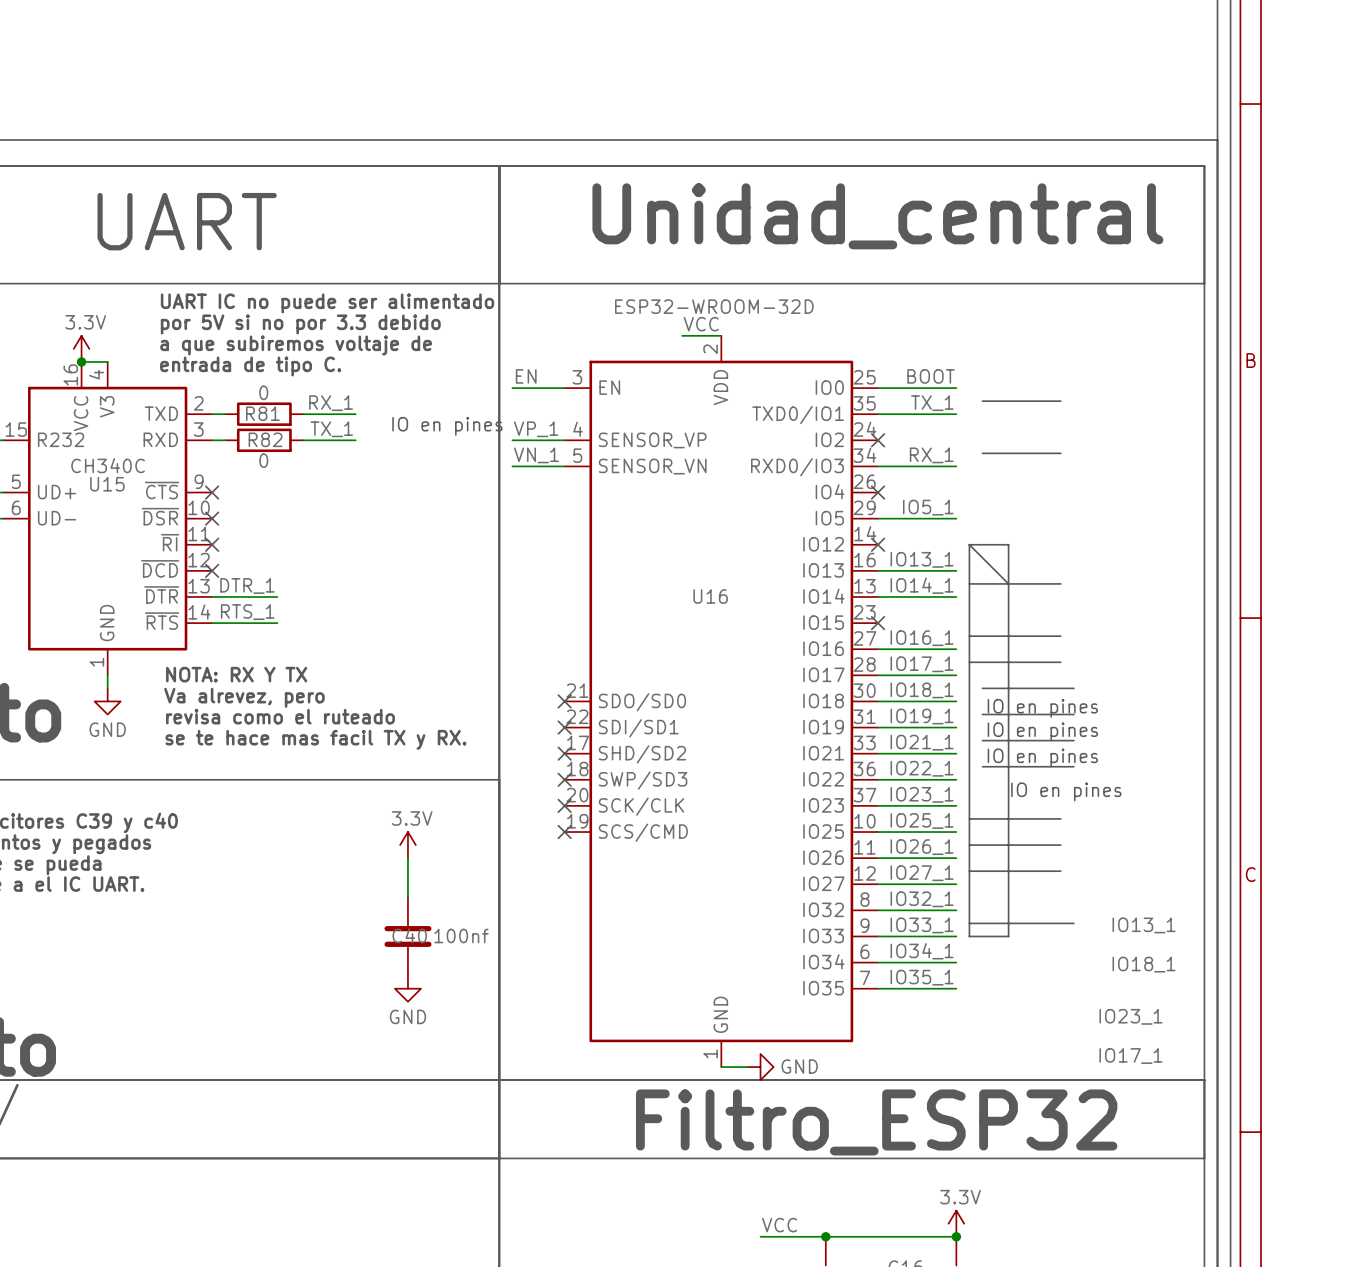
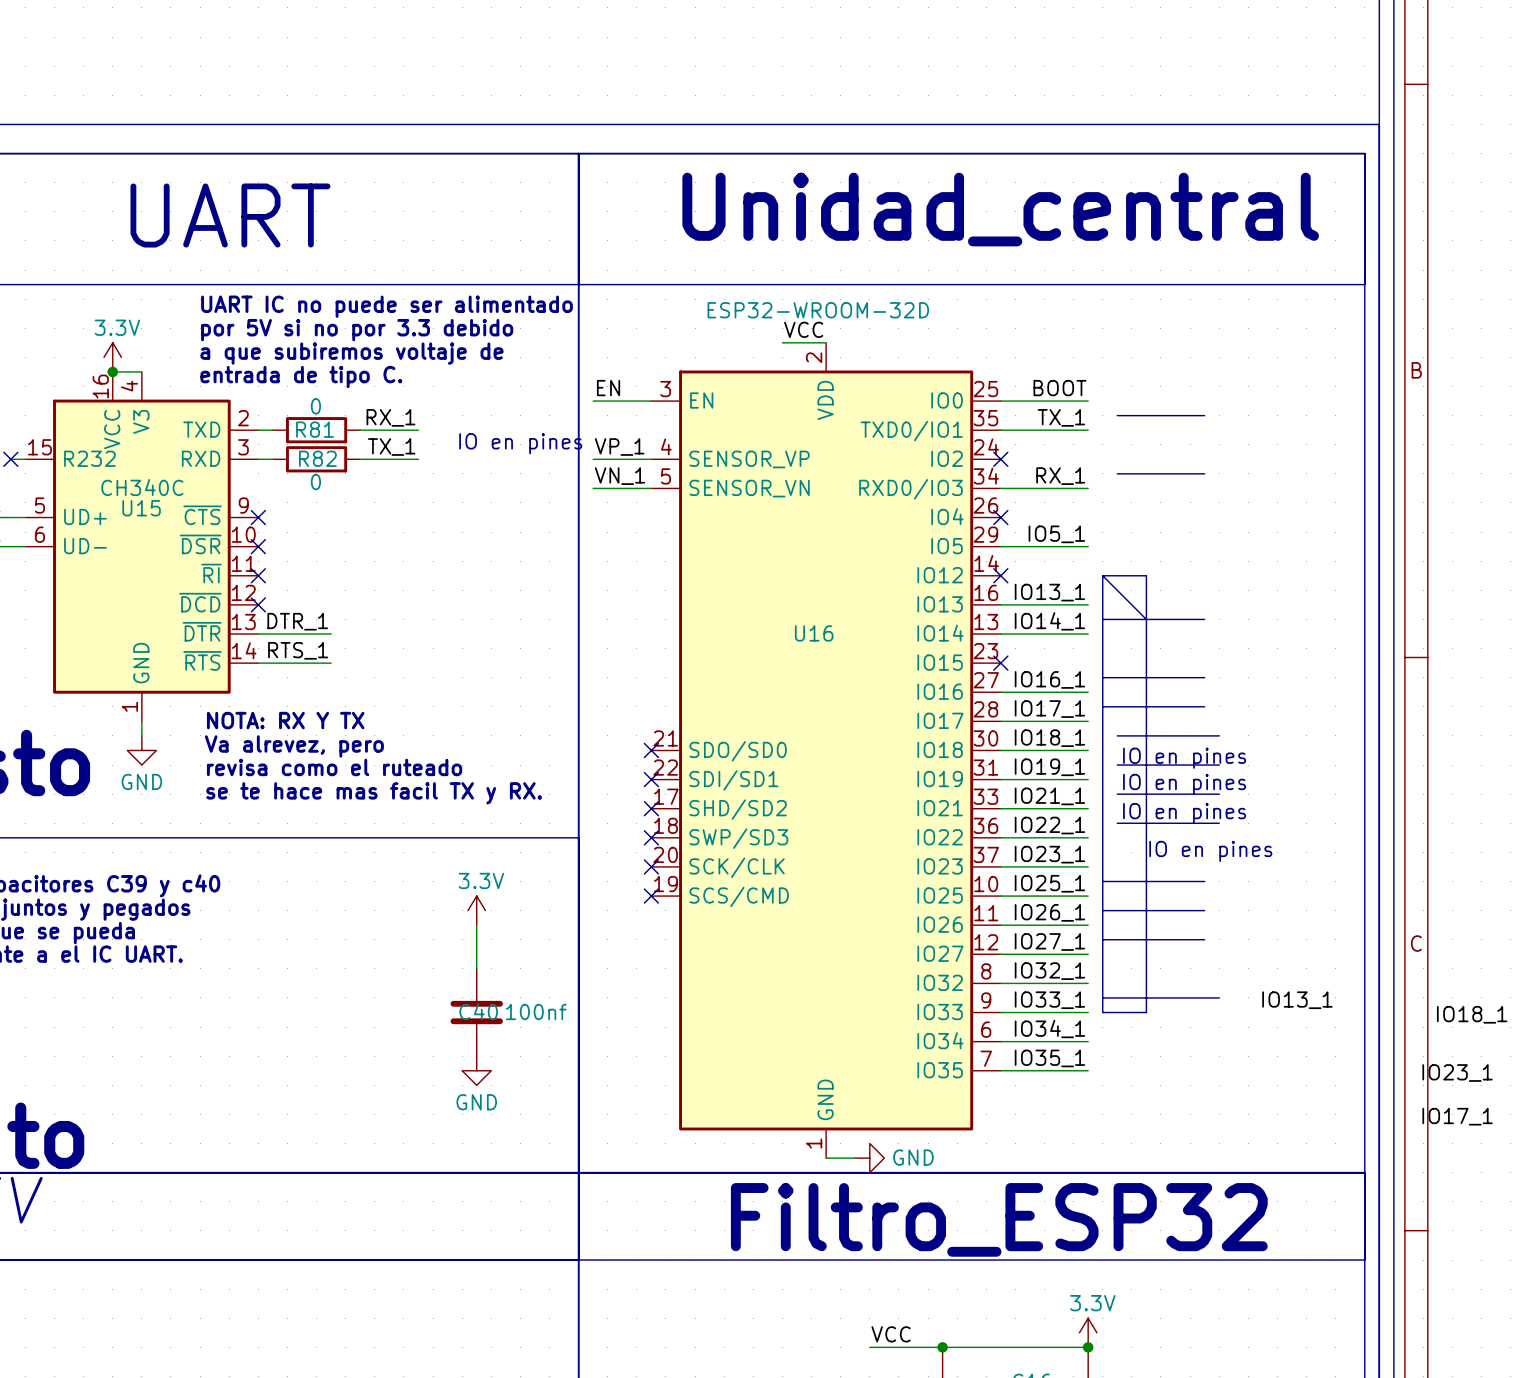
label position: IO18_1 (1144, 964) -> IO18_1 (1472, 1014)
label position: IO23_1 (1130, 1016) -> IO23_1 (1457, 1073)
label position: IO17_1 (1130, 1056) -> IO17_1 (1457, 1116)

